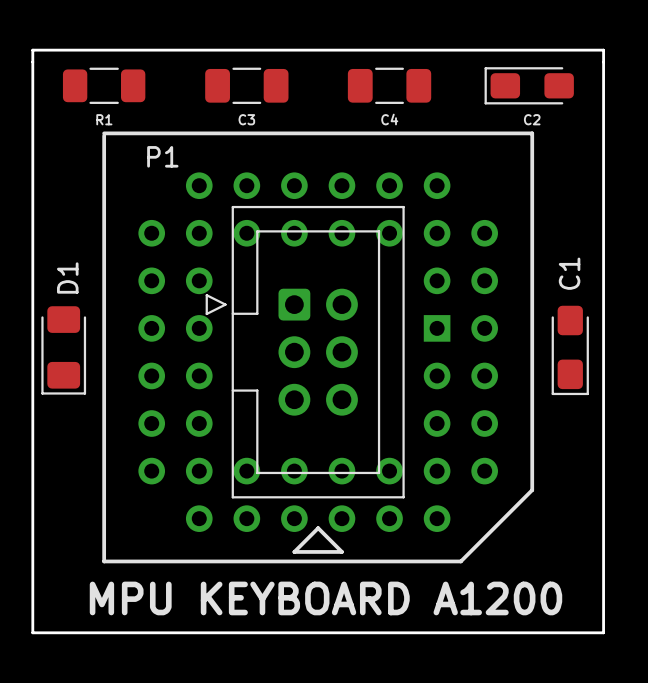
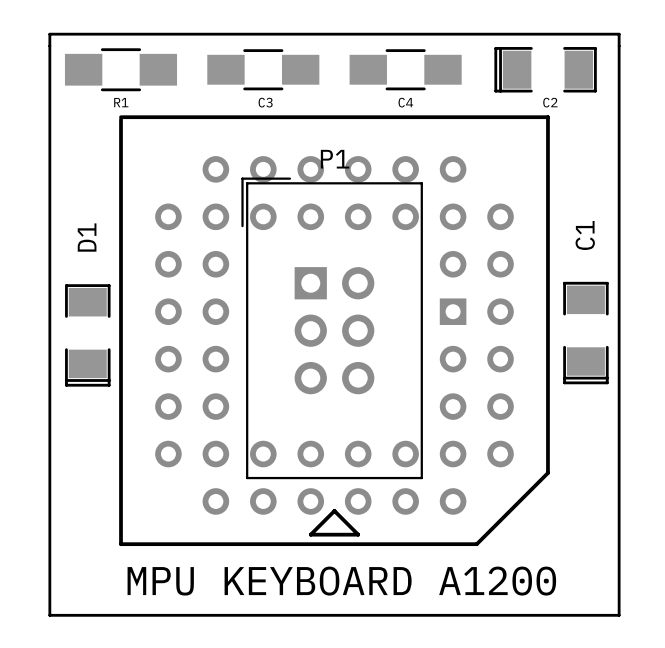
R1 footprint: [62, 67, 146, 104] -> [64, 48, 178, 92]
C3 footprint: [205, 67, 289, 104] -> [207, 49, 320, 91]
C4 footprint: [347, 67, 432, 104] -> [349, 49, 462, 91]
C2 footprint: [484, 67, 574, 105] -> [494, 47, 597, 93]
P1 name position: P1 (162, 156) -> P1 (335, 159)
P1 footprint: [205, 205, 405, 499] -> [241, 177, 423, 480]
C1 footprint: [551, 305, 589, 396] -> [563, 281, 609, 385]
D1 footprint: [41, 306, 87, 395] -> [65, 284, 111, 387]

